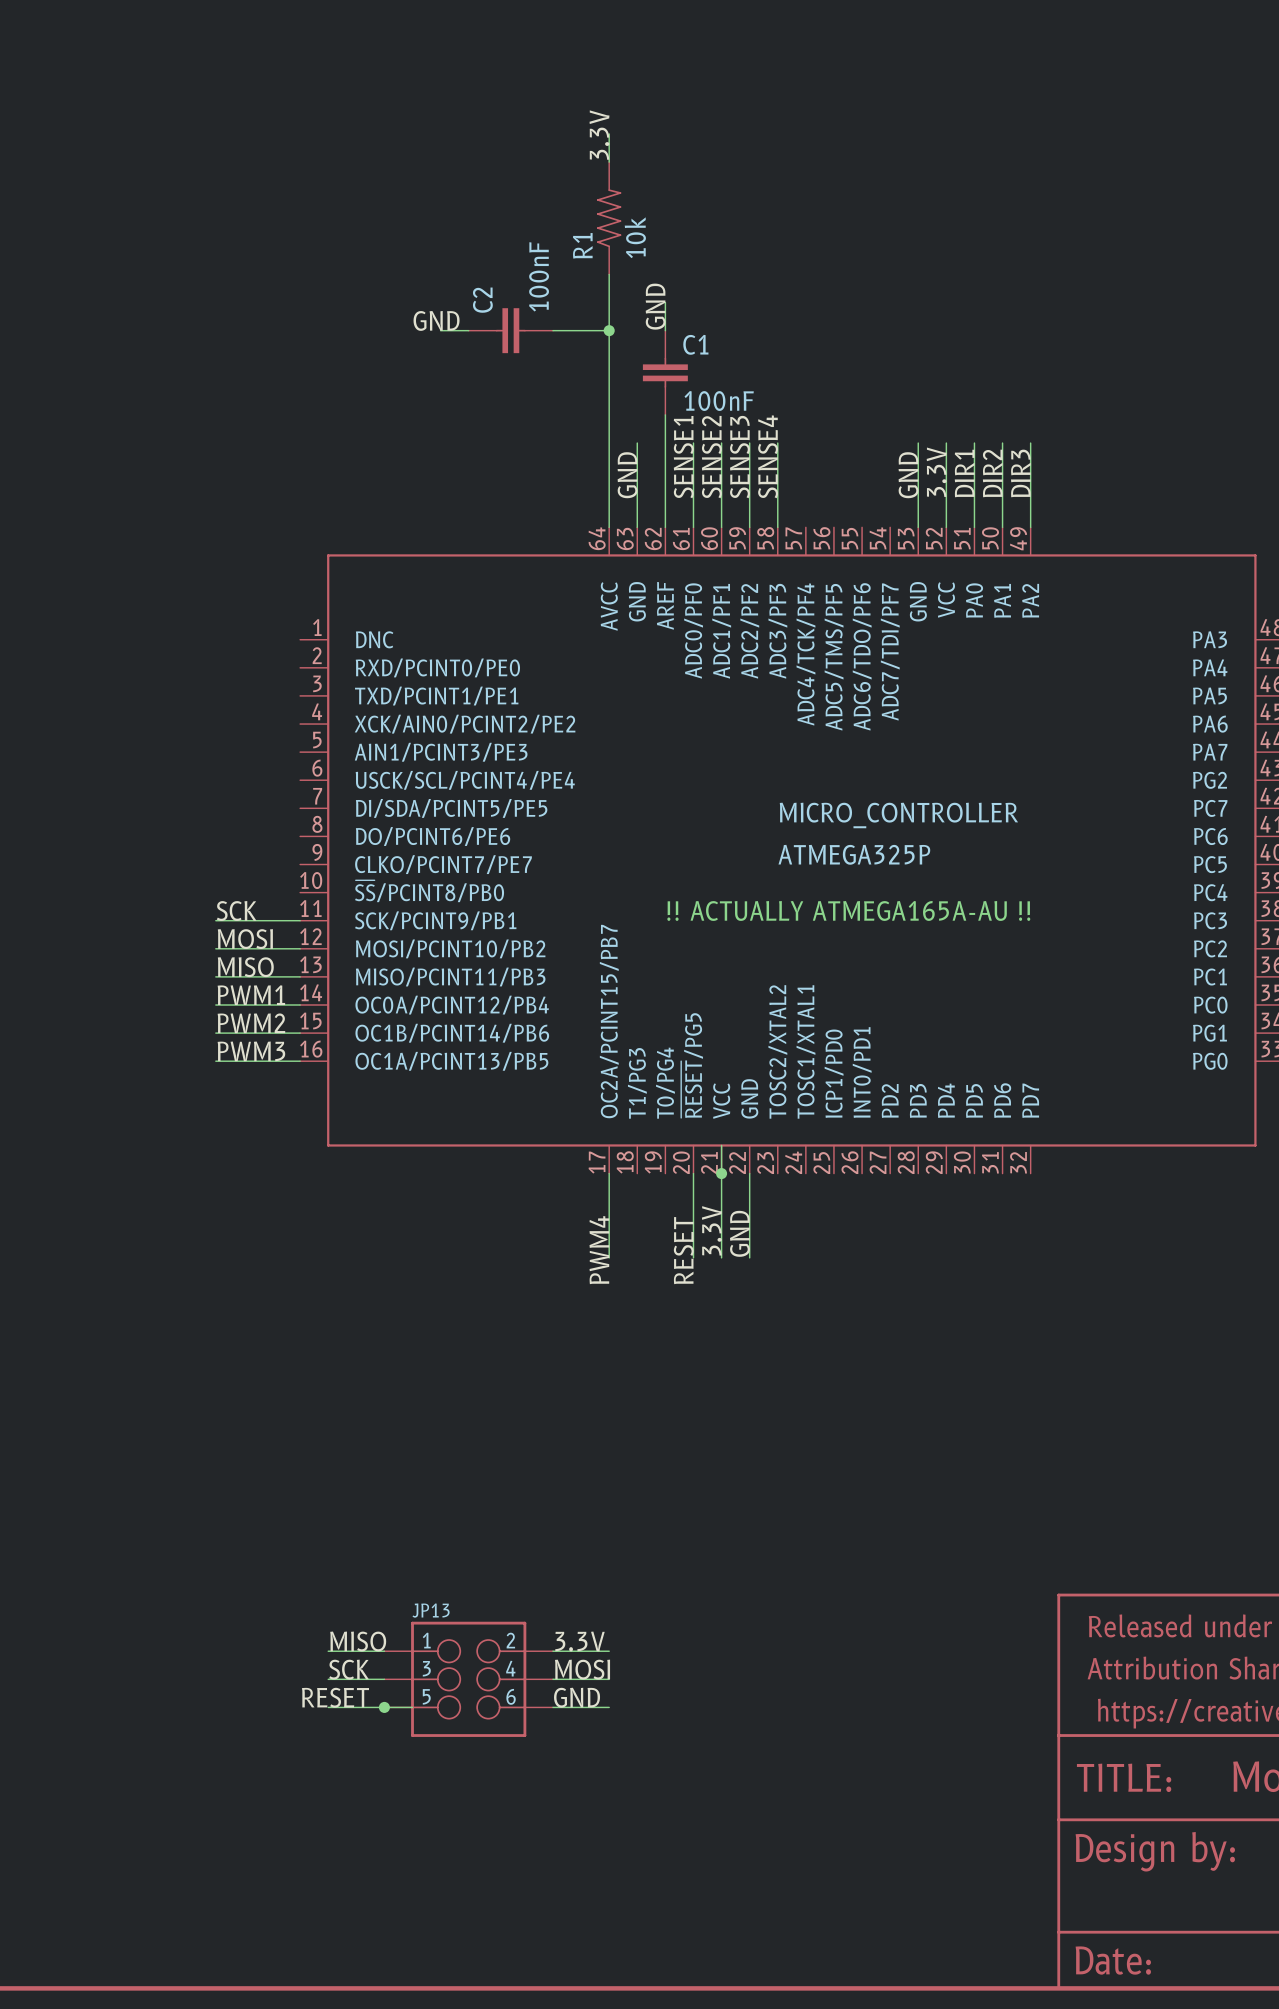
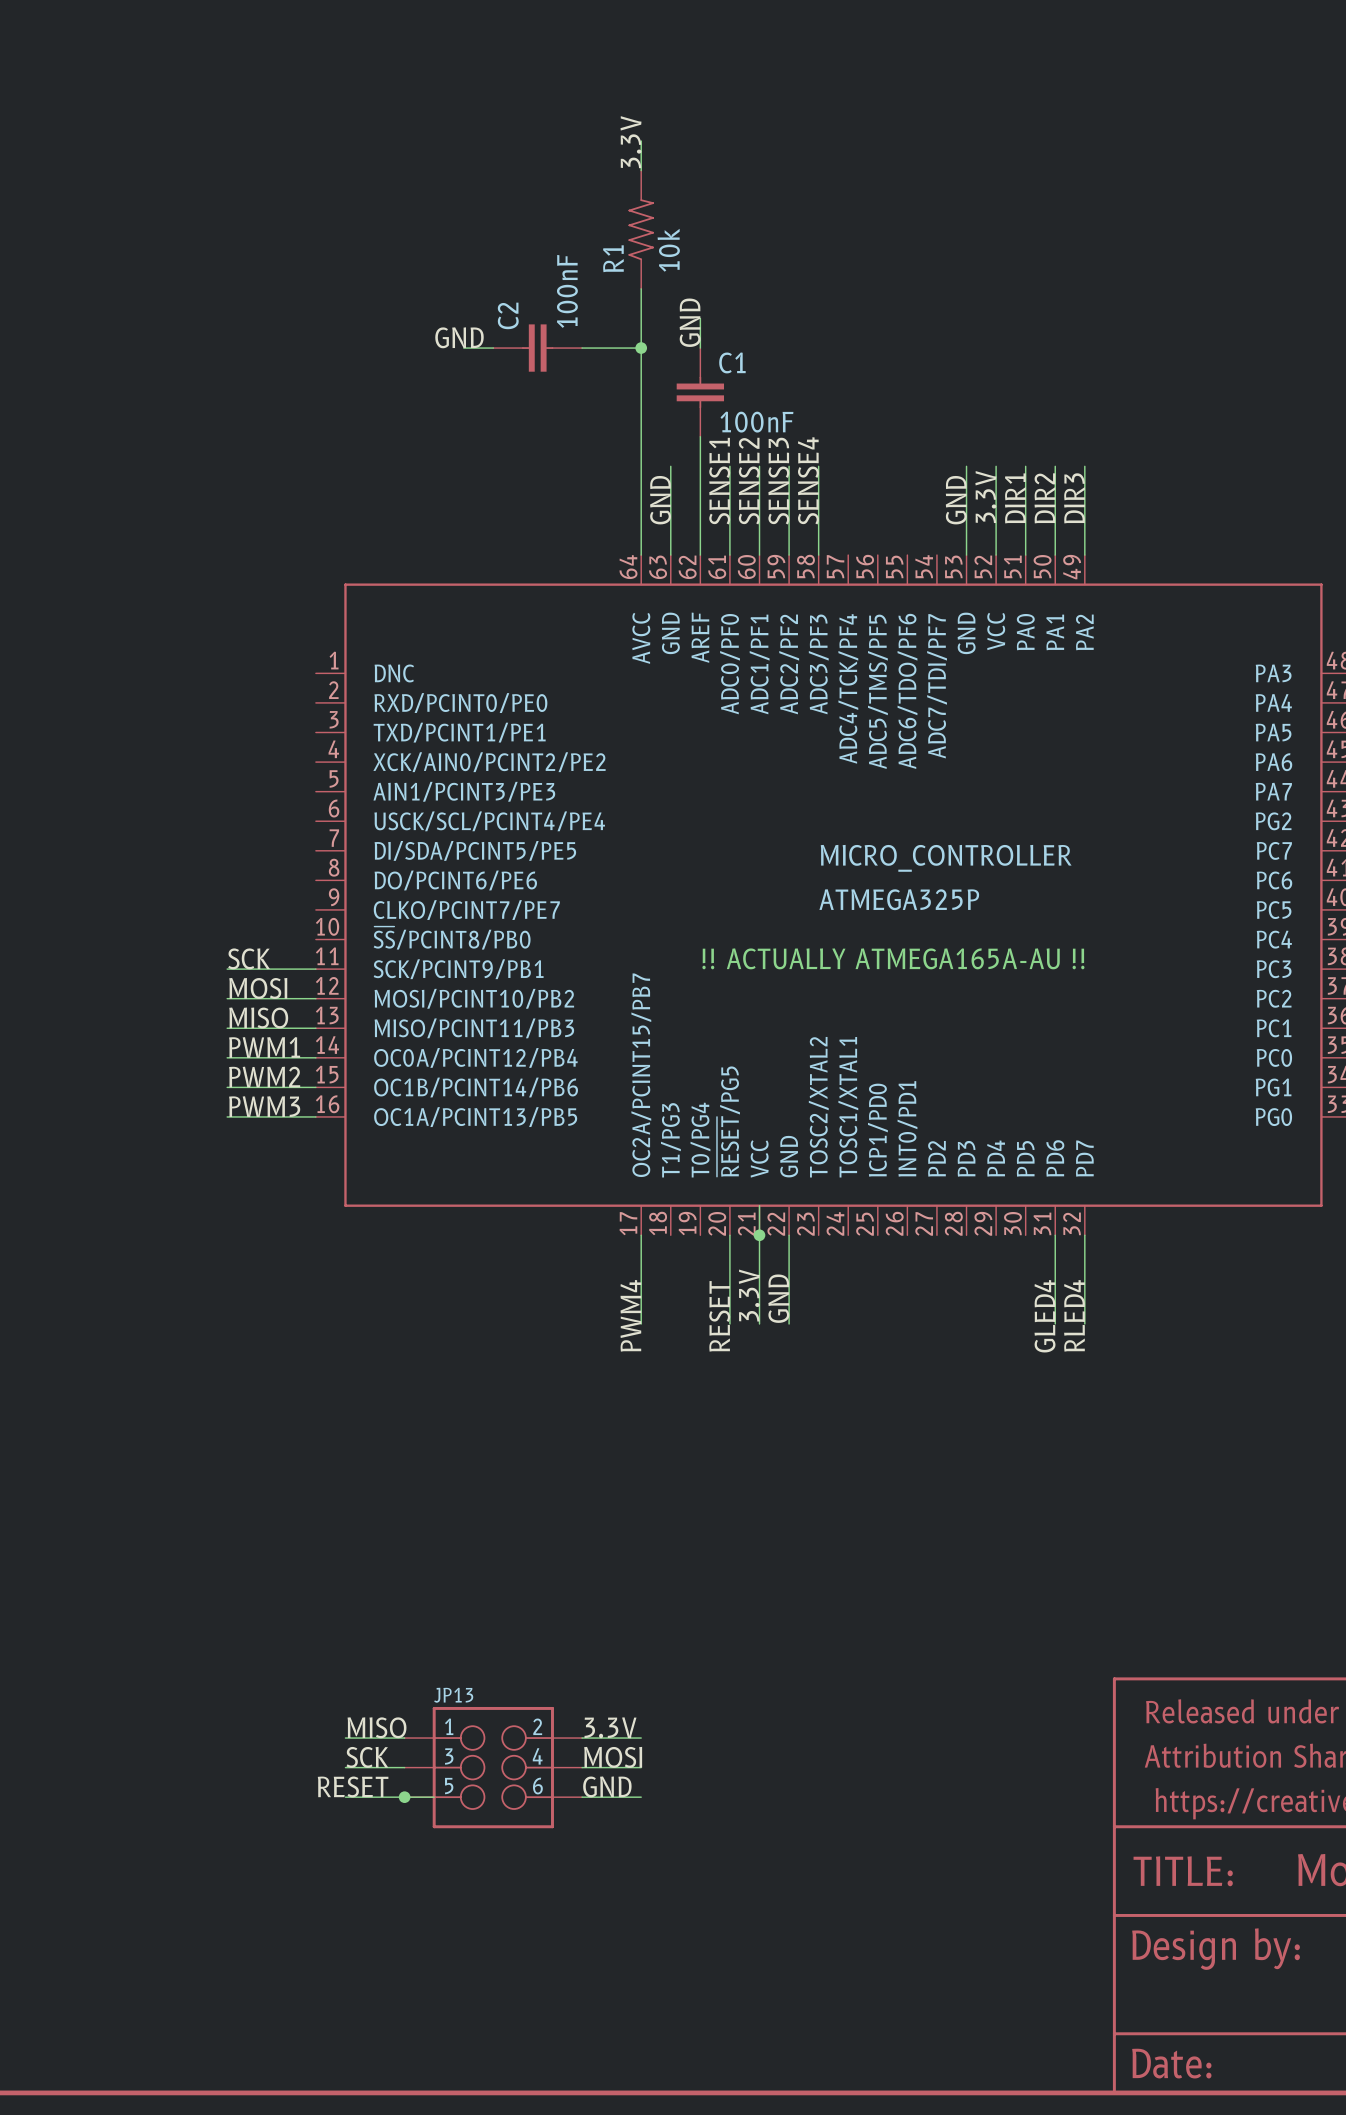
wire: none -> (1055, 1235) (1055, 1323)
wire: none -> (1084, 1235) (1084, 1323)
label: none -> GLED4 (1045, 1316)
label: none -> RLED4 (1074, 1315)

